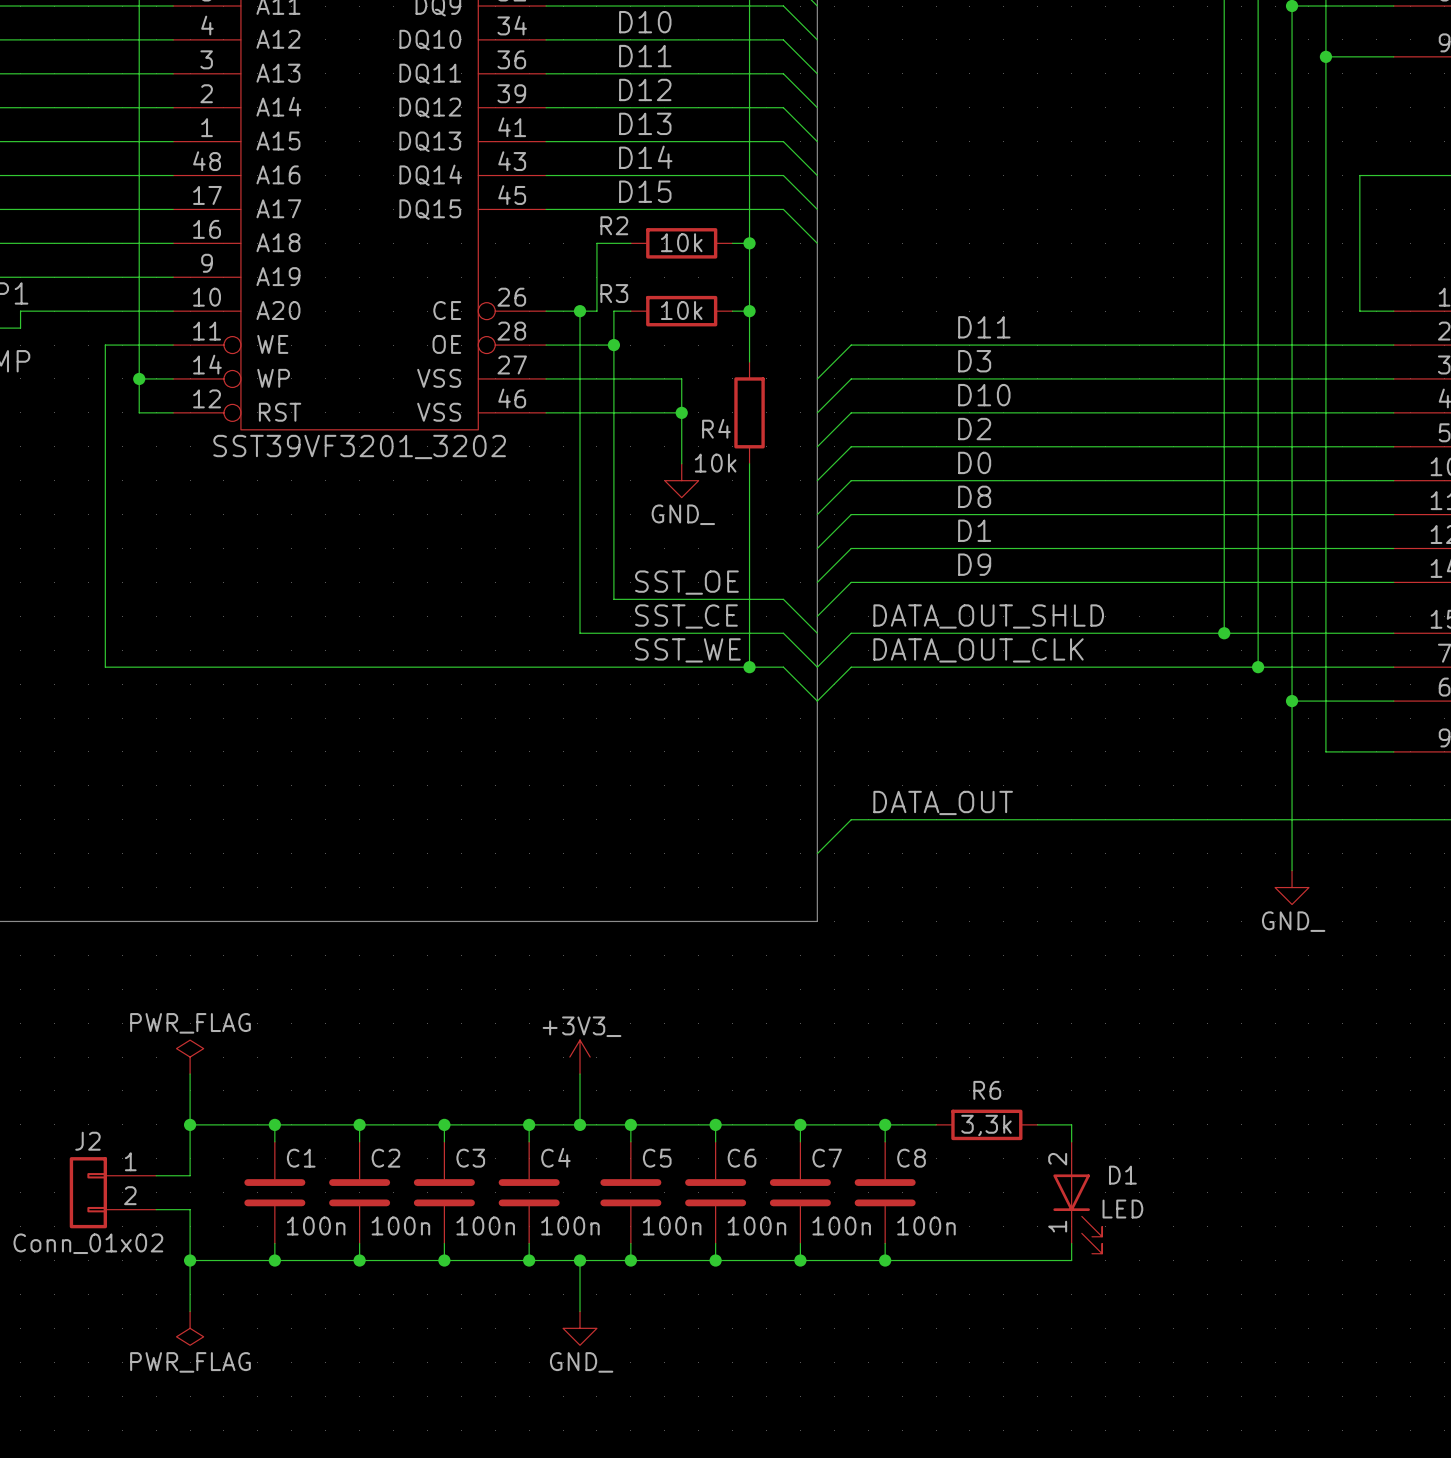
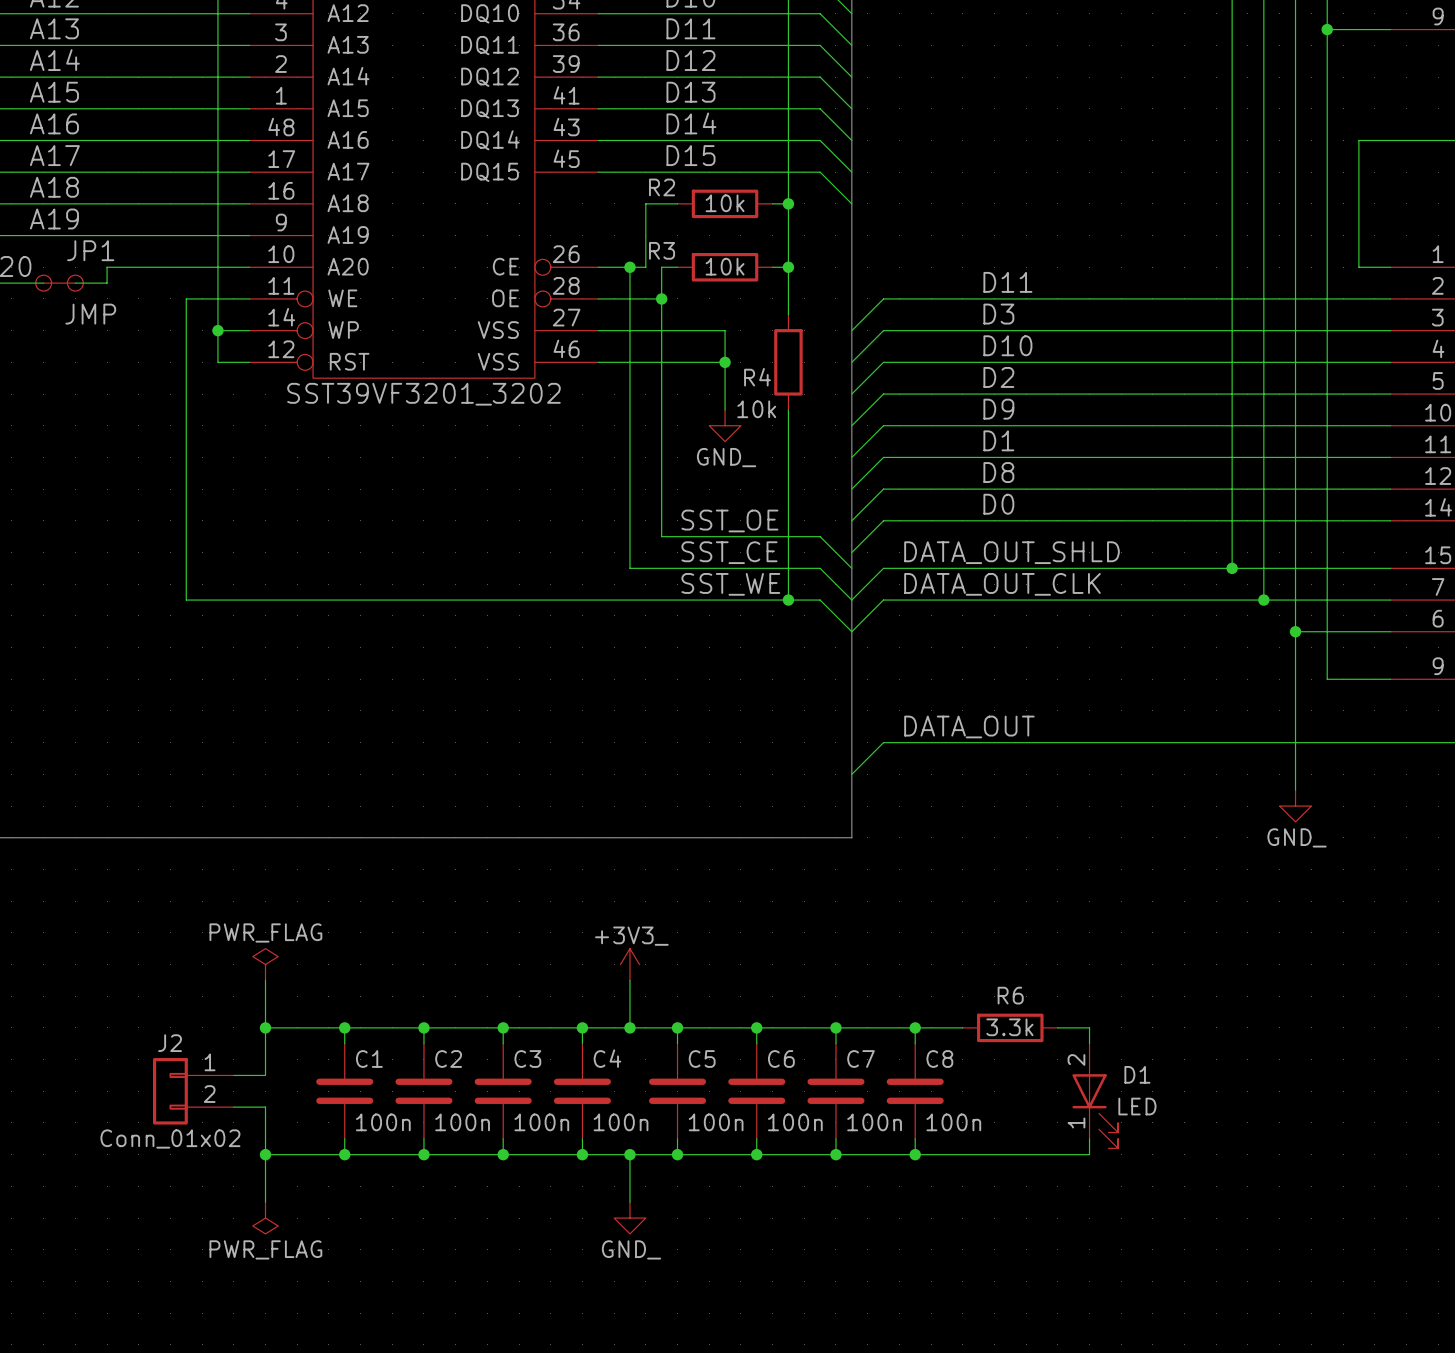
label: D0 (974, 462) -> D9 (998, 409)
label: D8 (974, 496) -> D1 (998, 440)
label: D1 (974, 530) -> D8 (998, 472)
label: D9 (974, 564) -> D0 (998, 504)
R6 value: 3,3k (986, 1125) -> 3.3k (1009, 1027)

